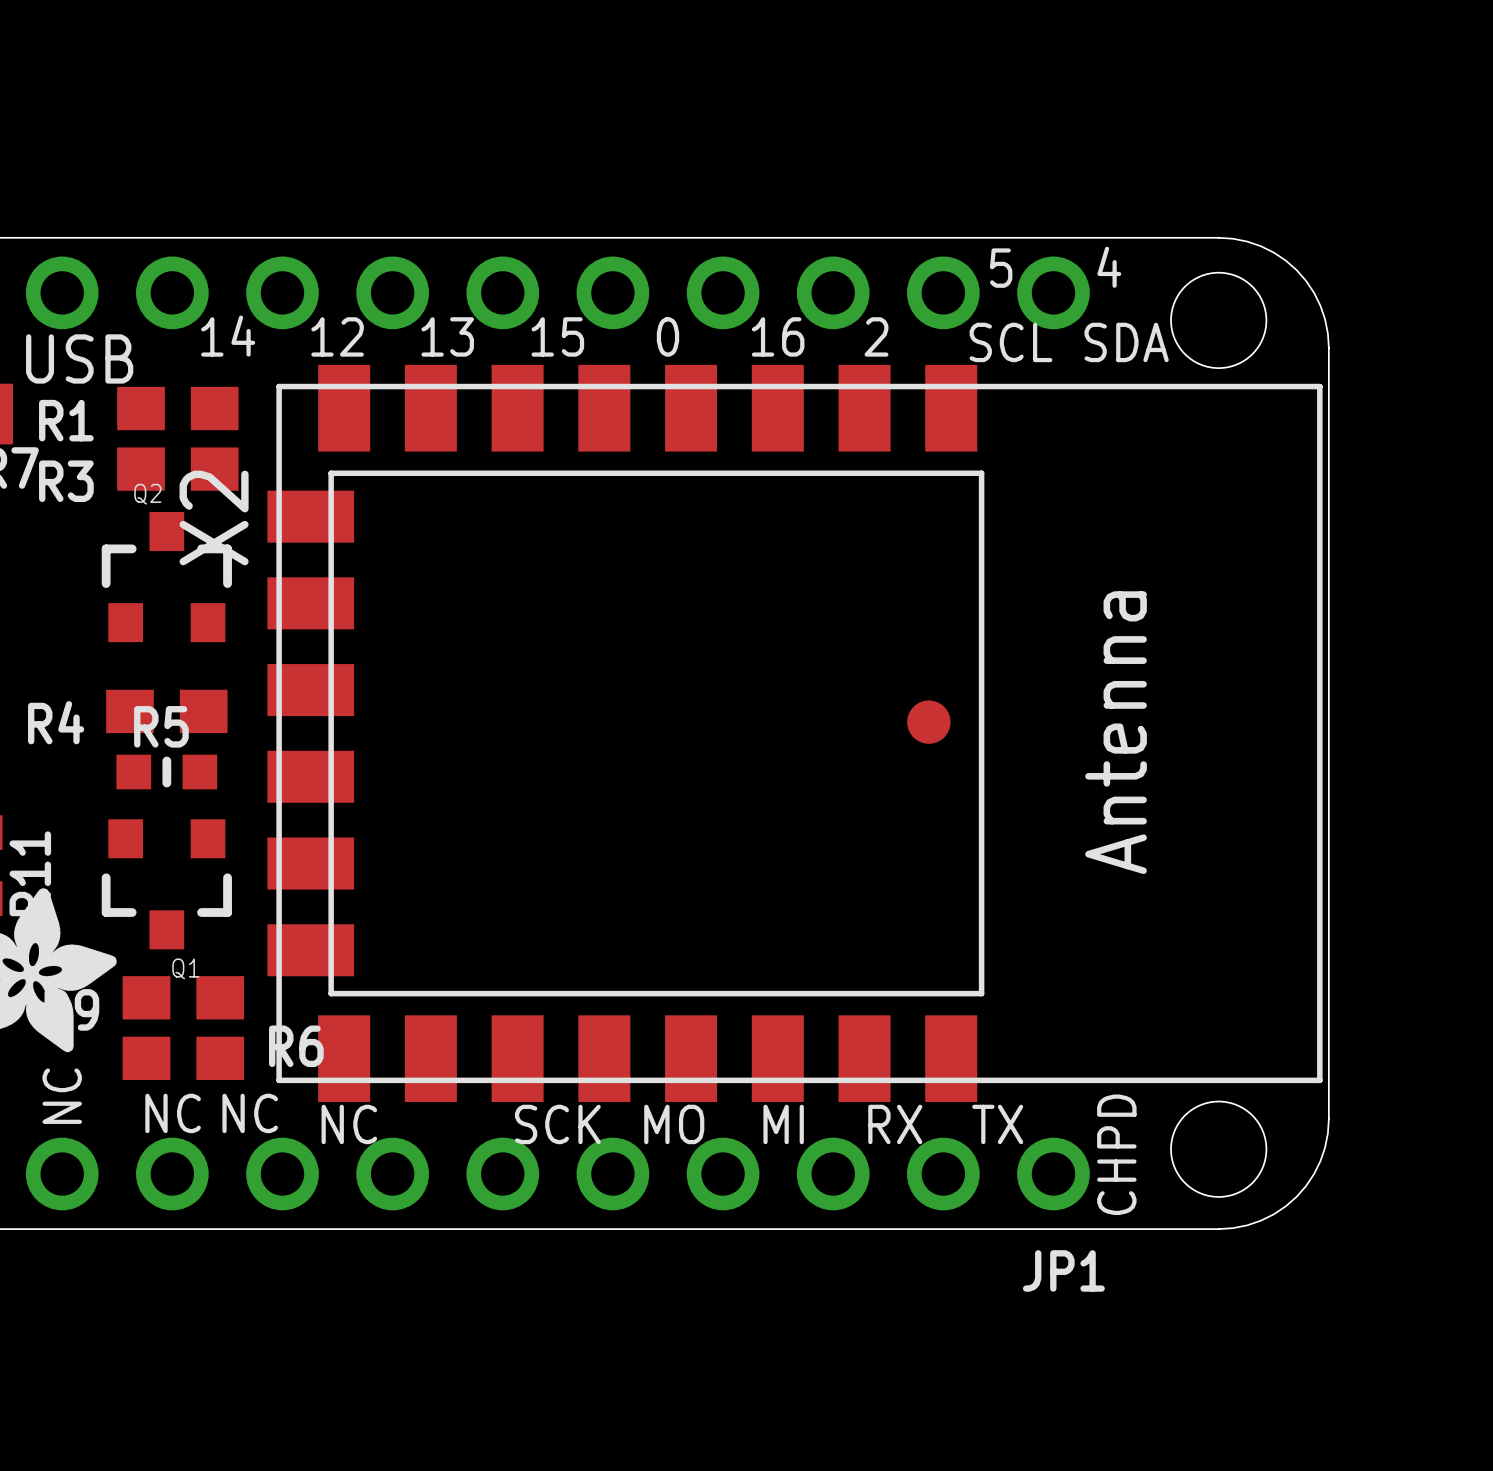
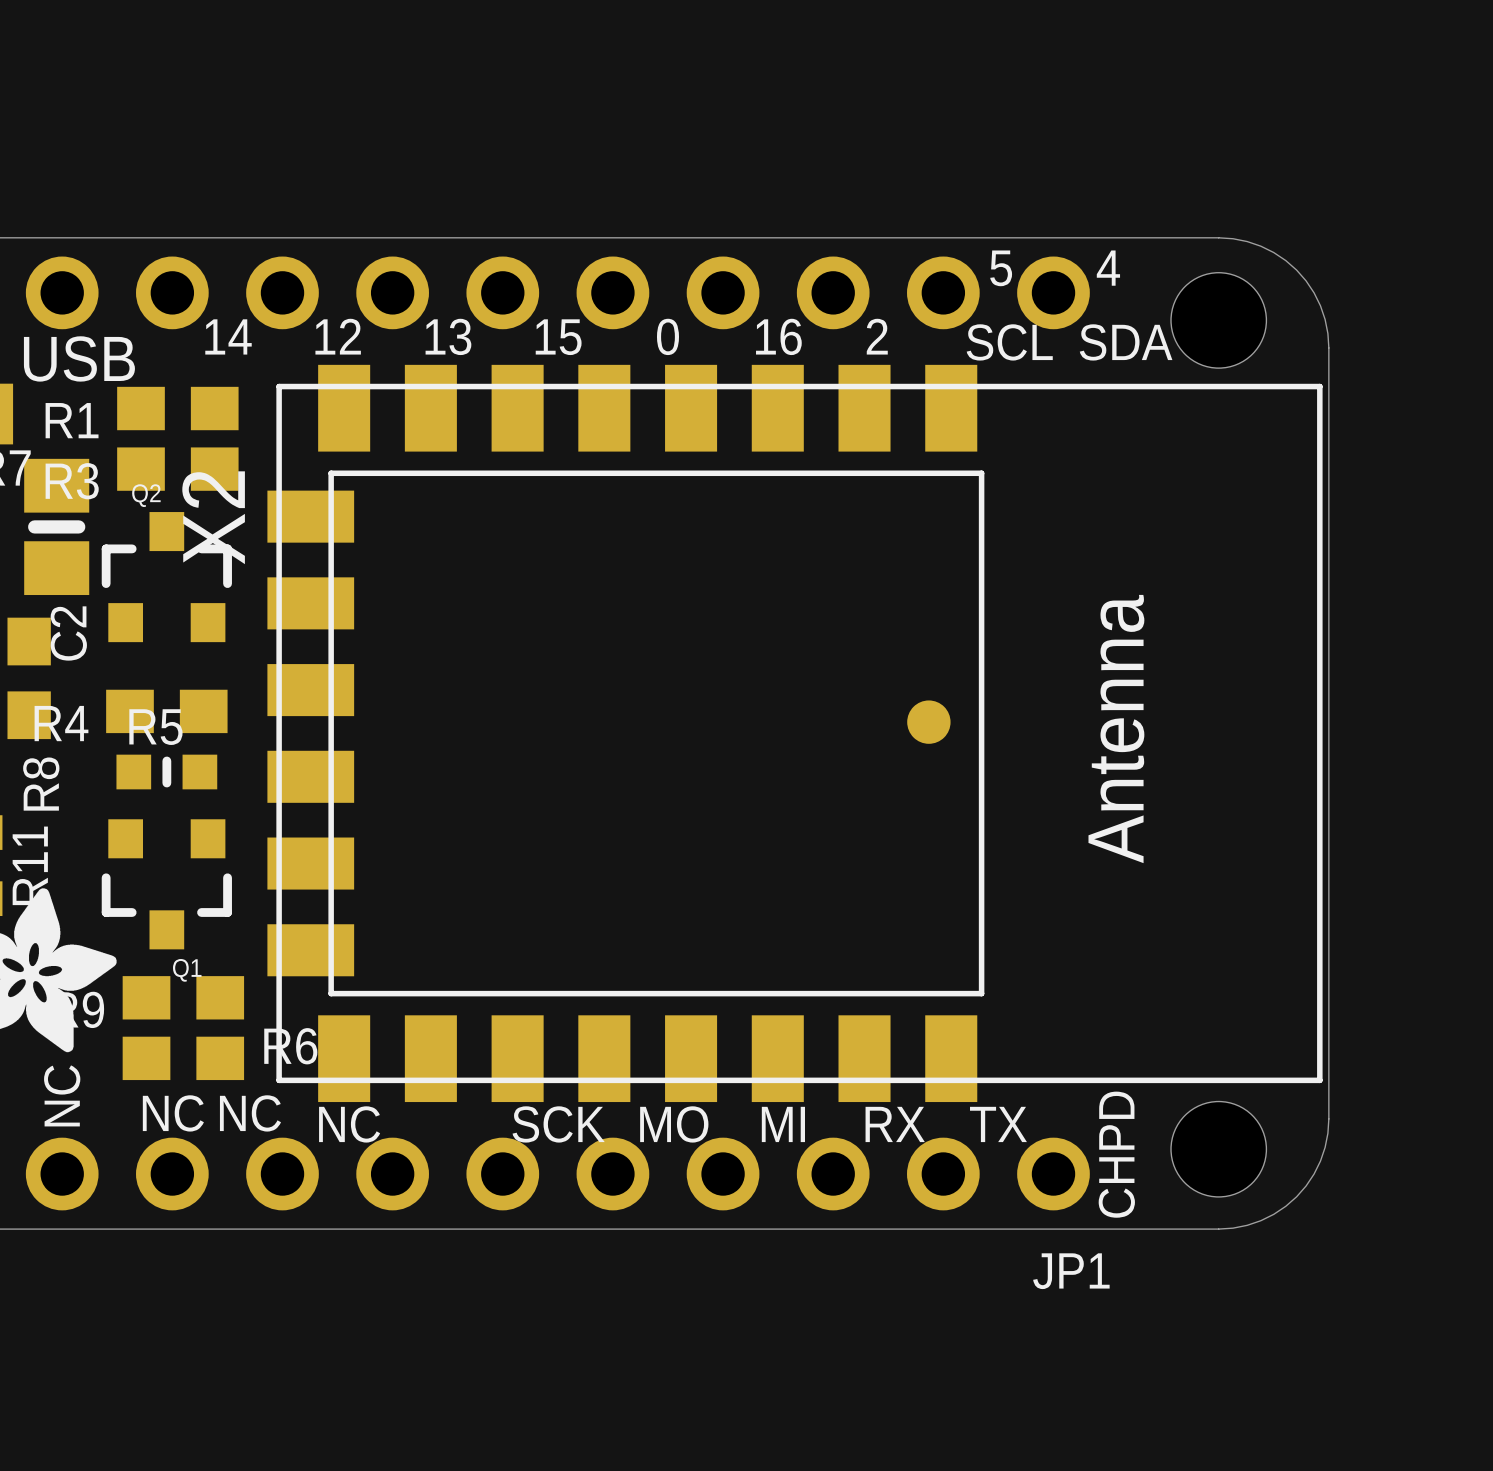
C2: none -> (56, 526)
R8: none -> (29, 678)

